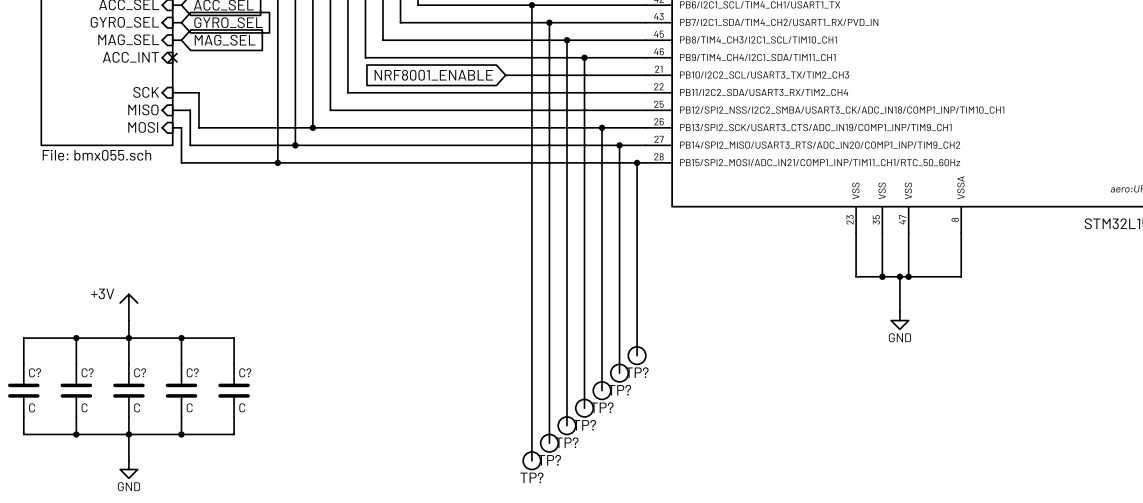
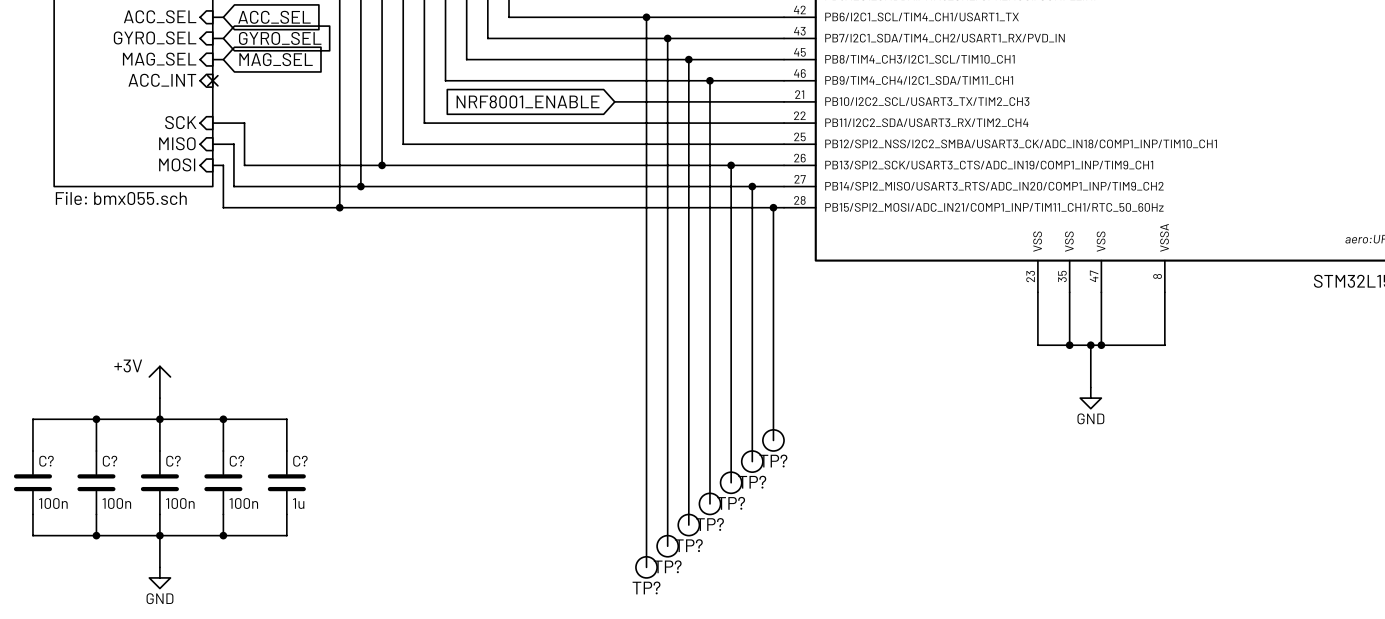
C? value: C (32, 407) -> 100n (53, 503)
C? value: C (84, 407) -> 100n (116, 503)
C? value: C (137, 407) -> 100n (180, 503)
C? value: C (189, 407) -> 100n (243, 503)
C? value: C (242, 407) -> 1u (298, 503)

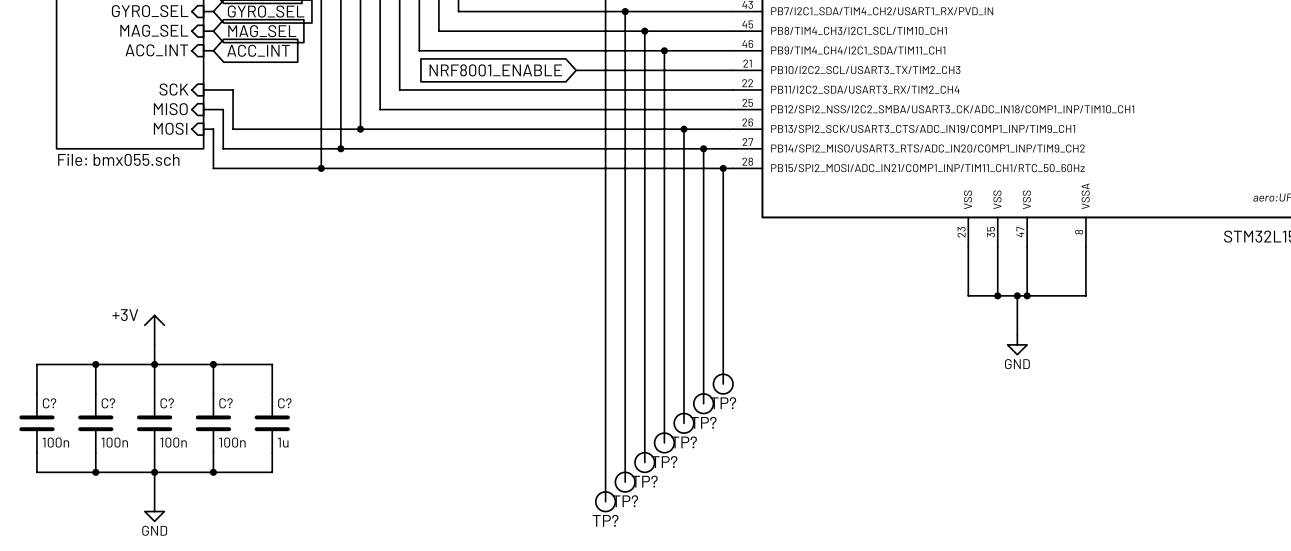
wire: none -> (203, 50) (213, 50)
no-connect mark: (212, 80) -> none
global label: none -> ACC_INT (258, 50)

